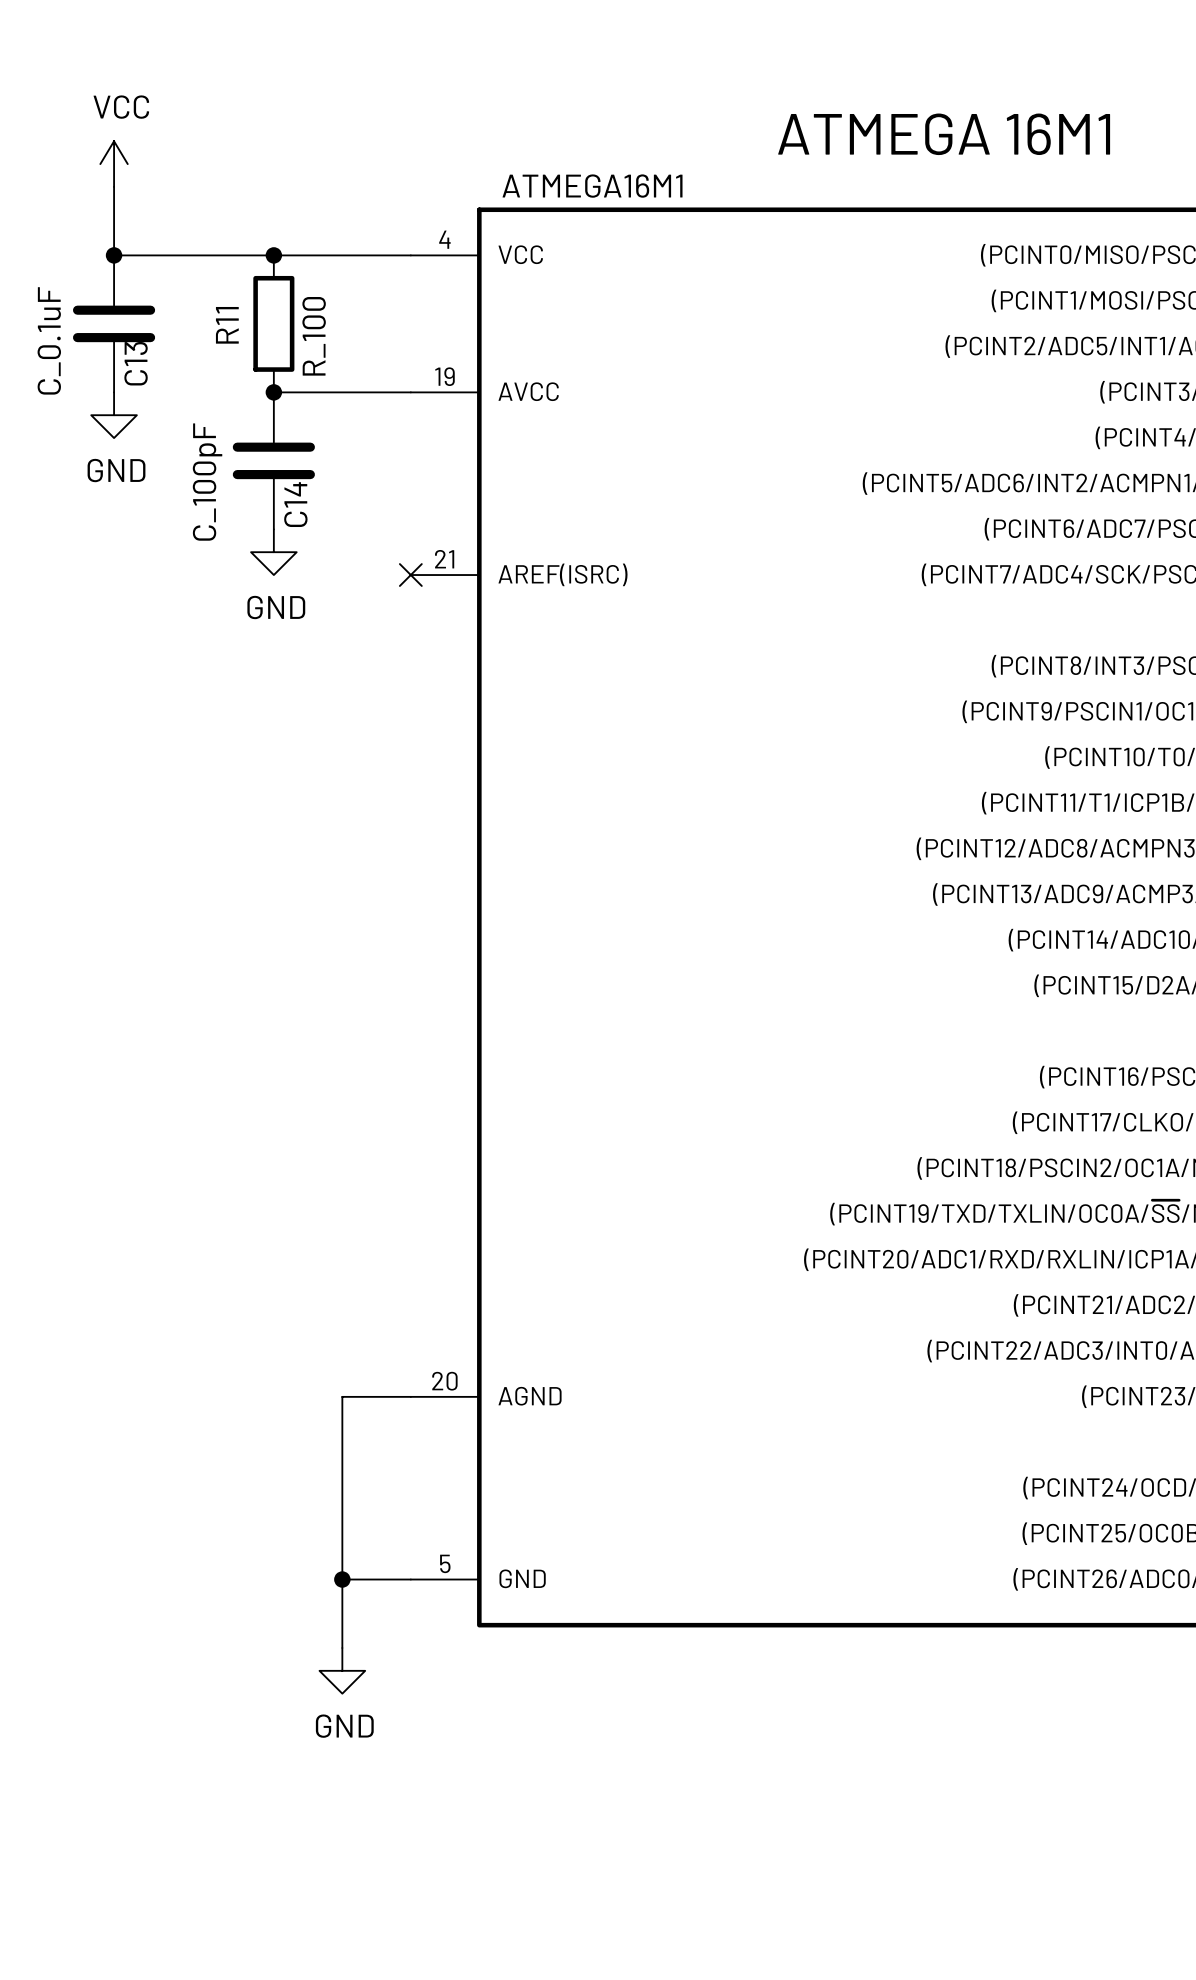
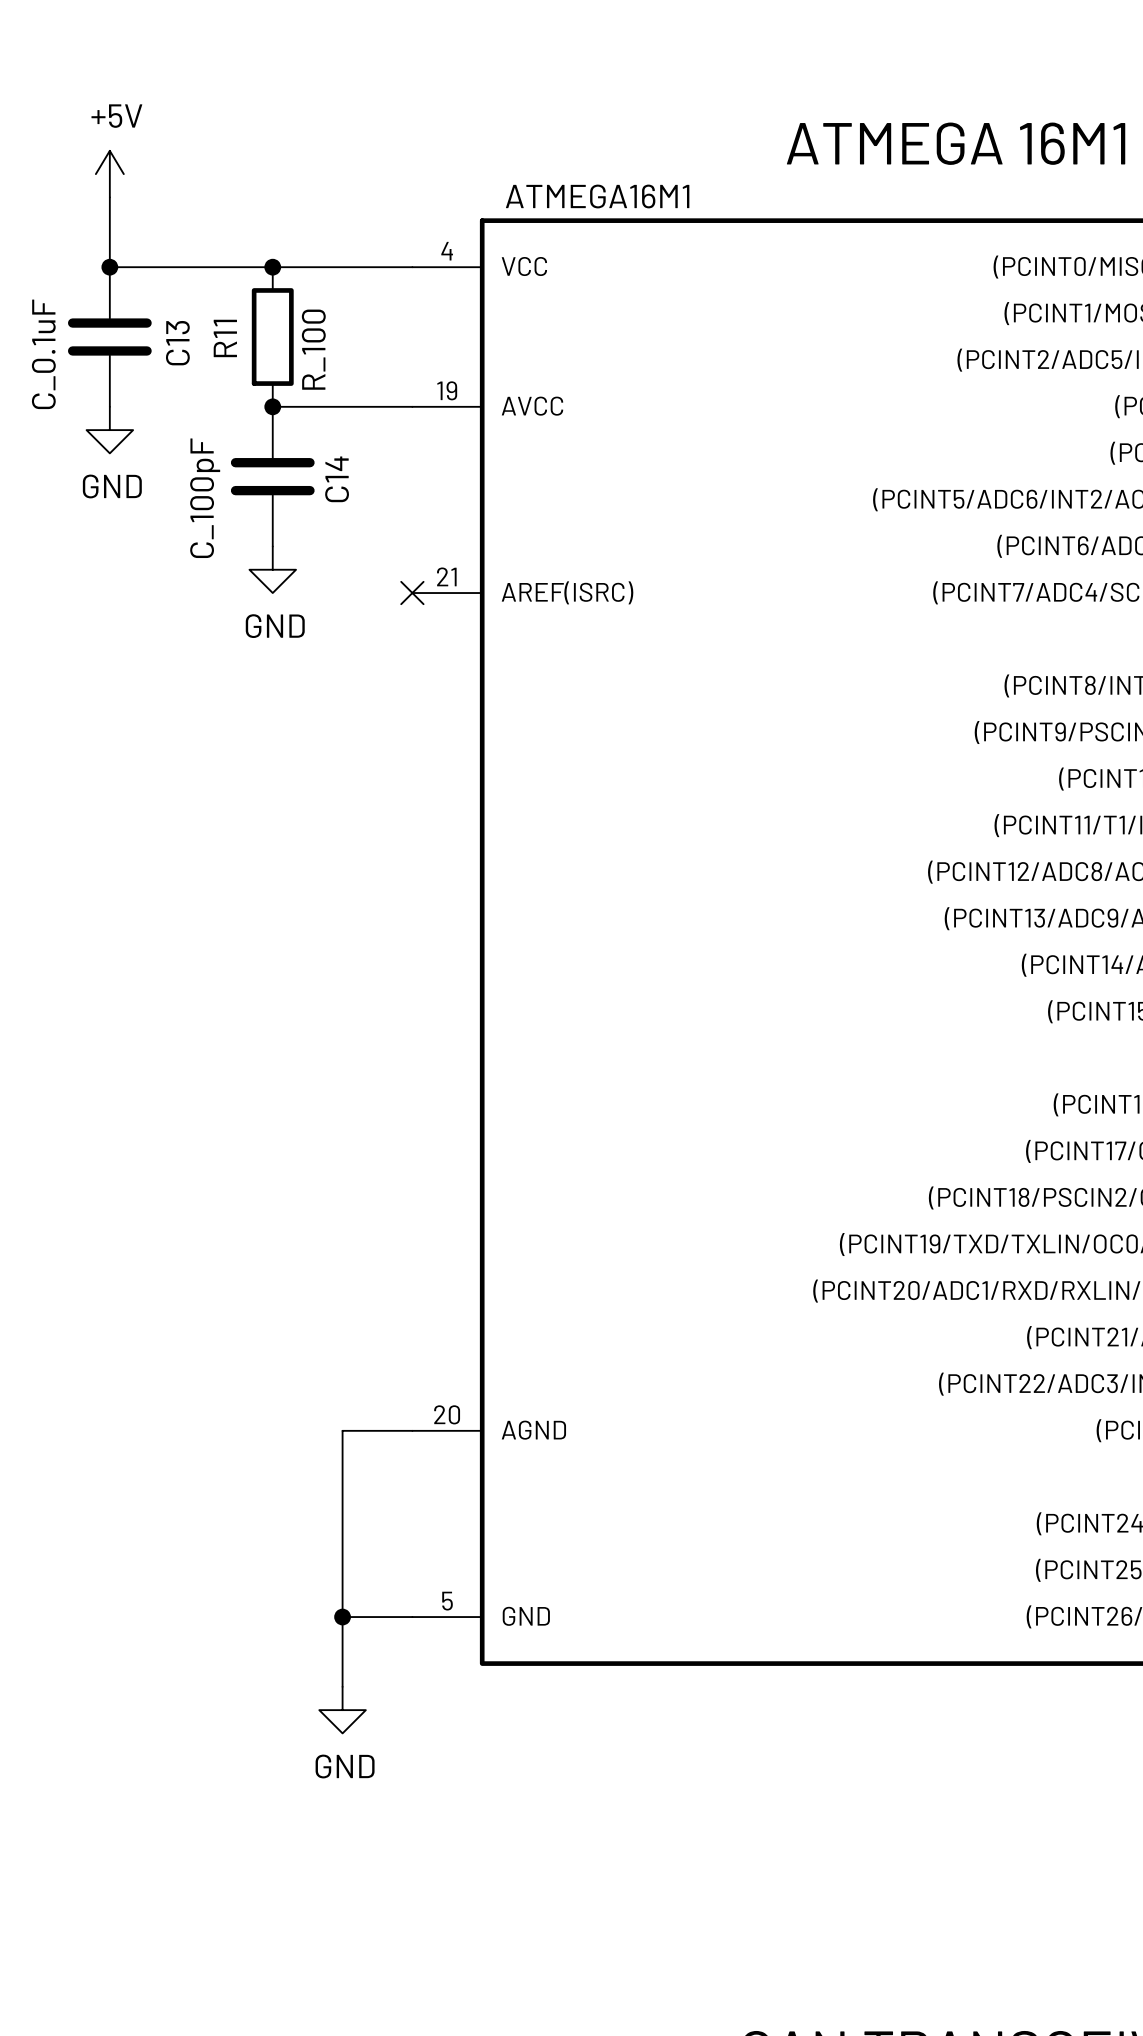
power symbol: VCC (114, 164) -> +5V (109, 174)
C13 name position: C13 (136, 363) -> C13 (177, 343)
C14 name position: C14 (295, 504) -> C14 (337, 479)

